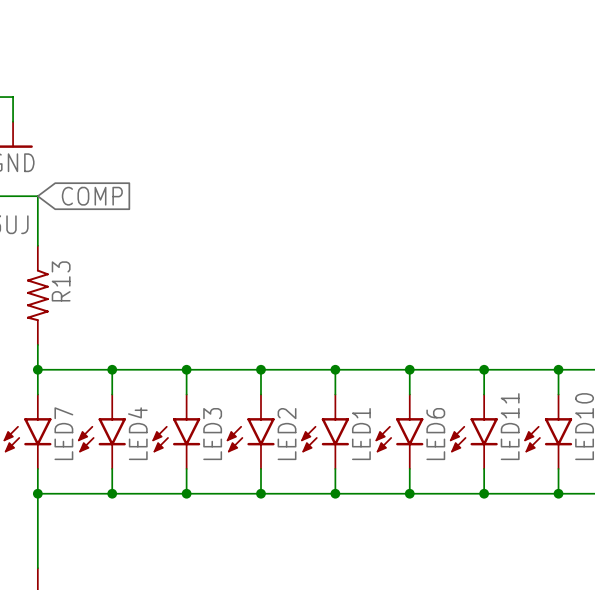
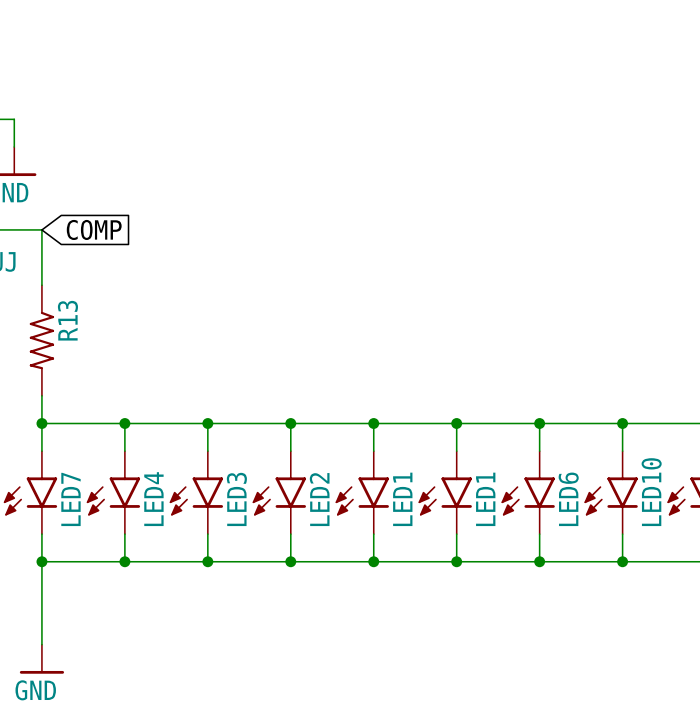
LED11 name: LED11 (510, 426) -> LED6 (568, 499)
LED6 name: LED6 (435, 434) -> LED1 (485, 499)

